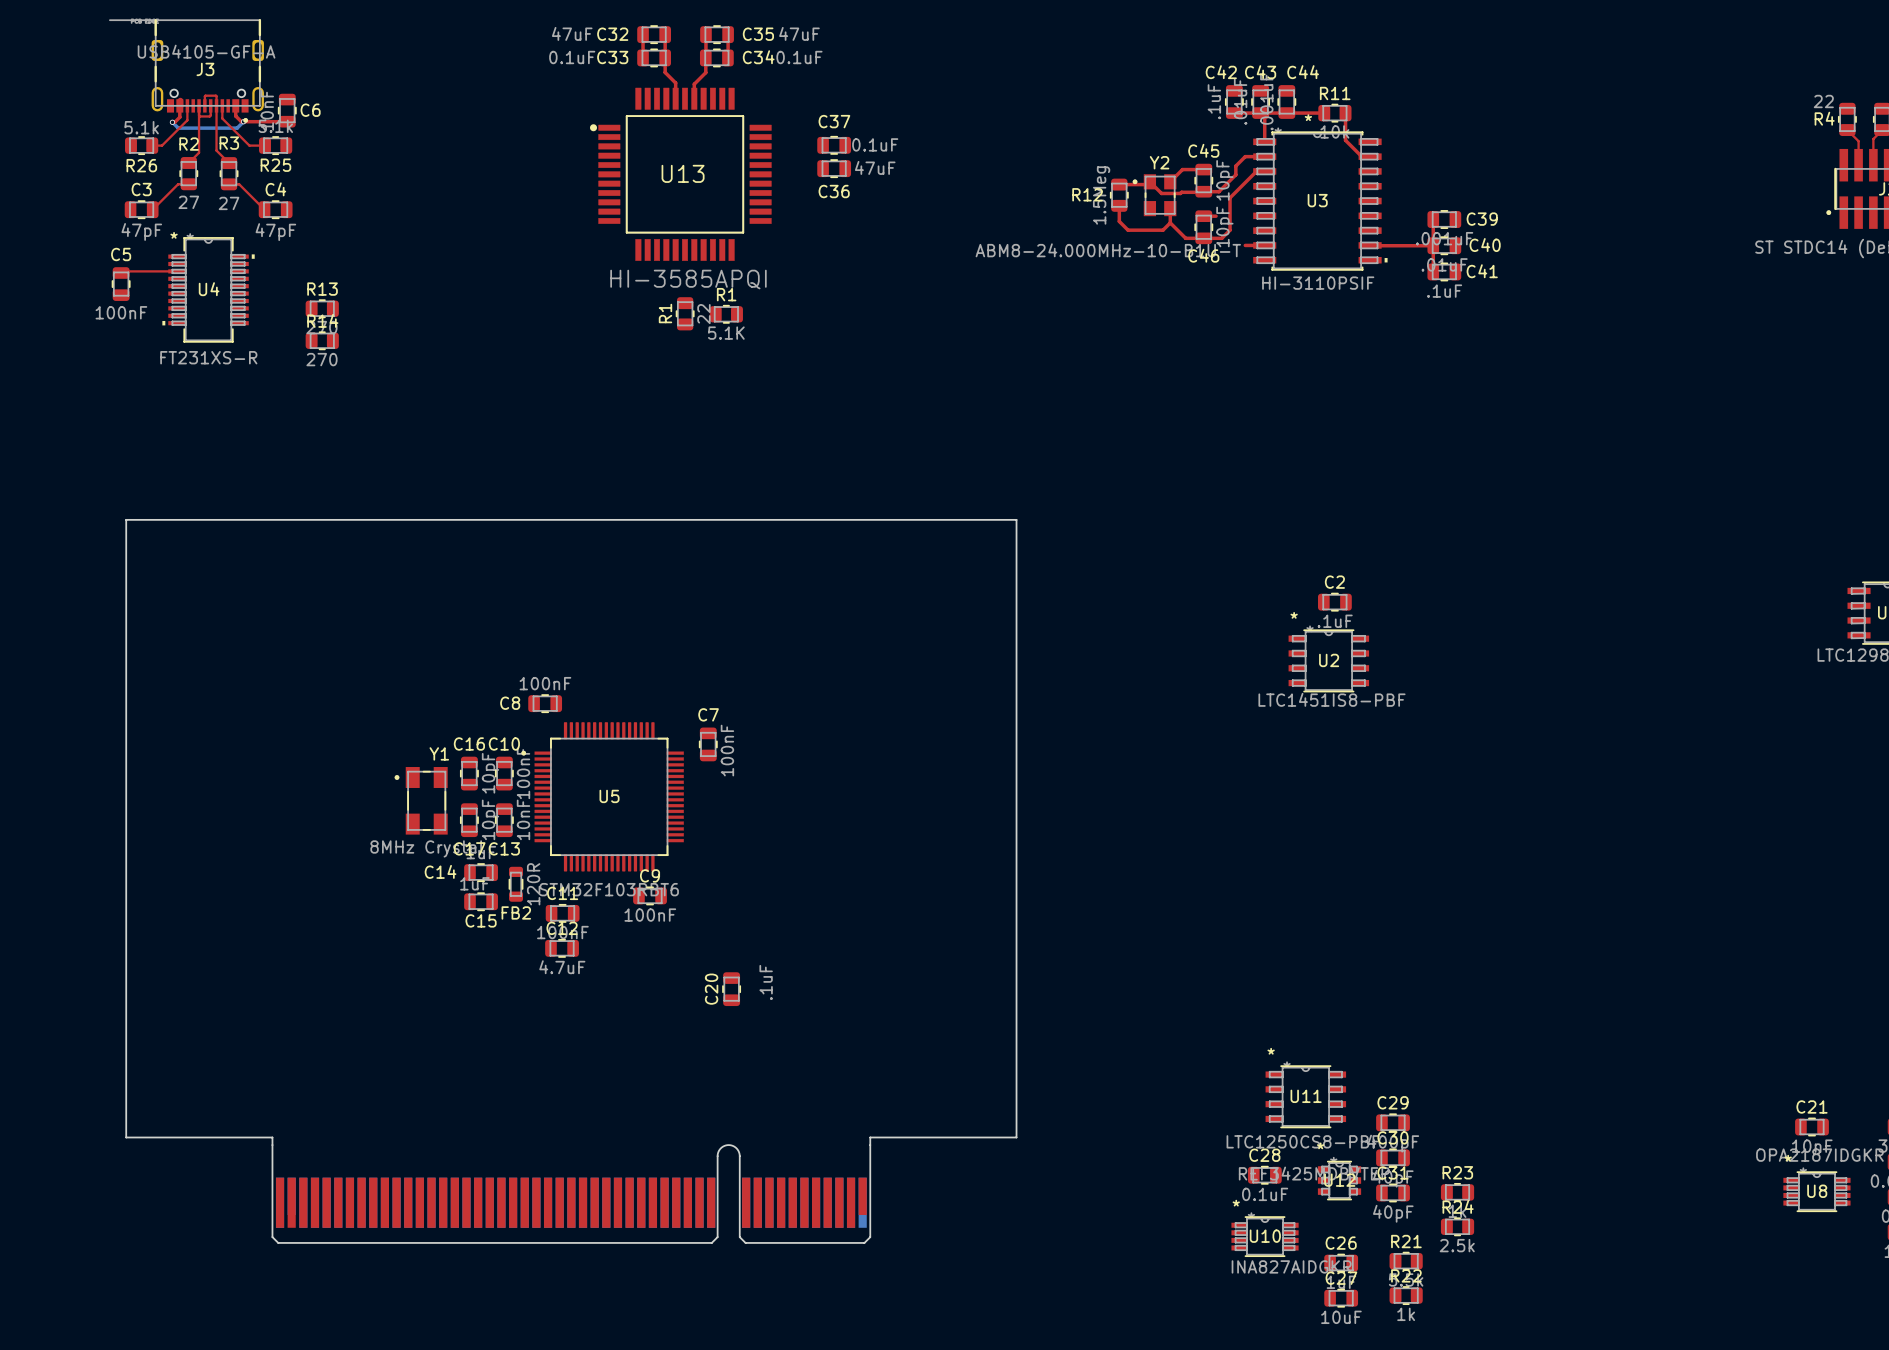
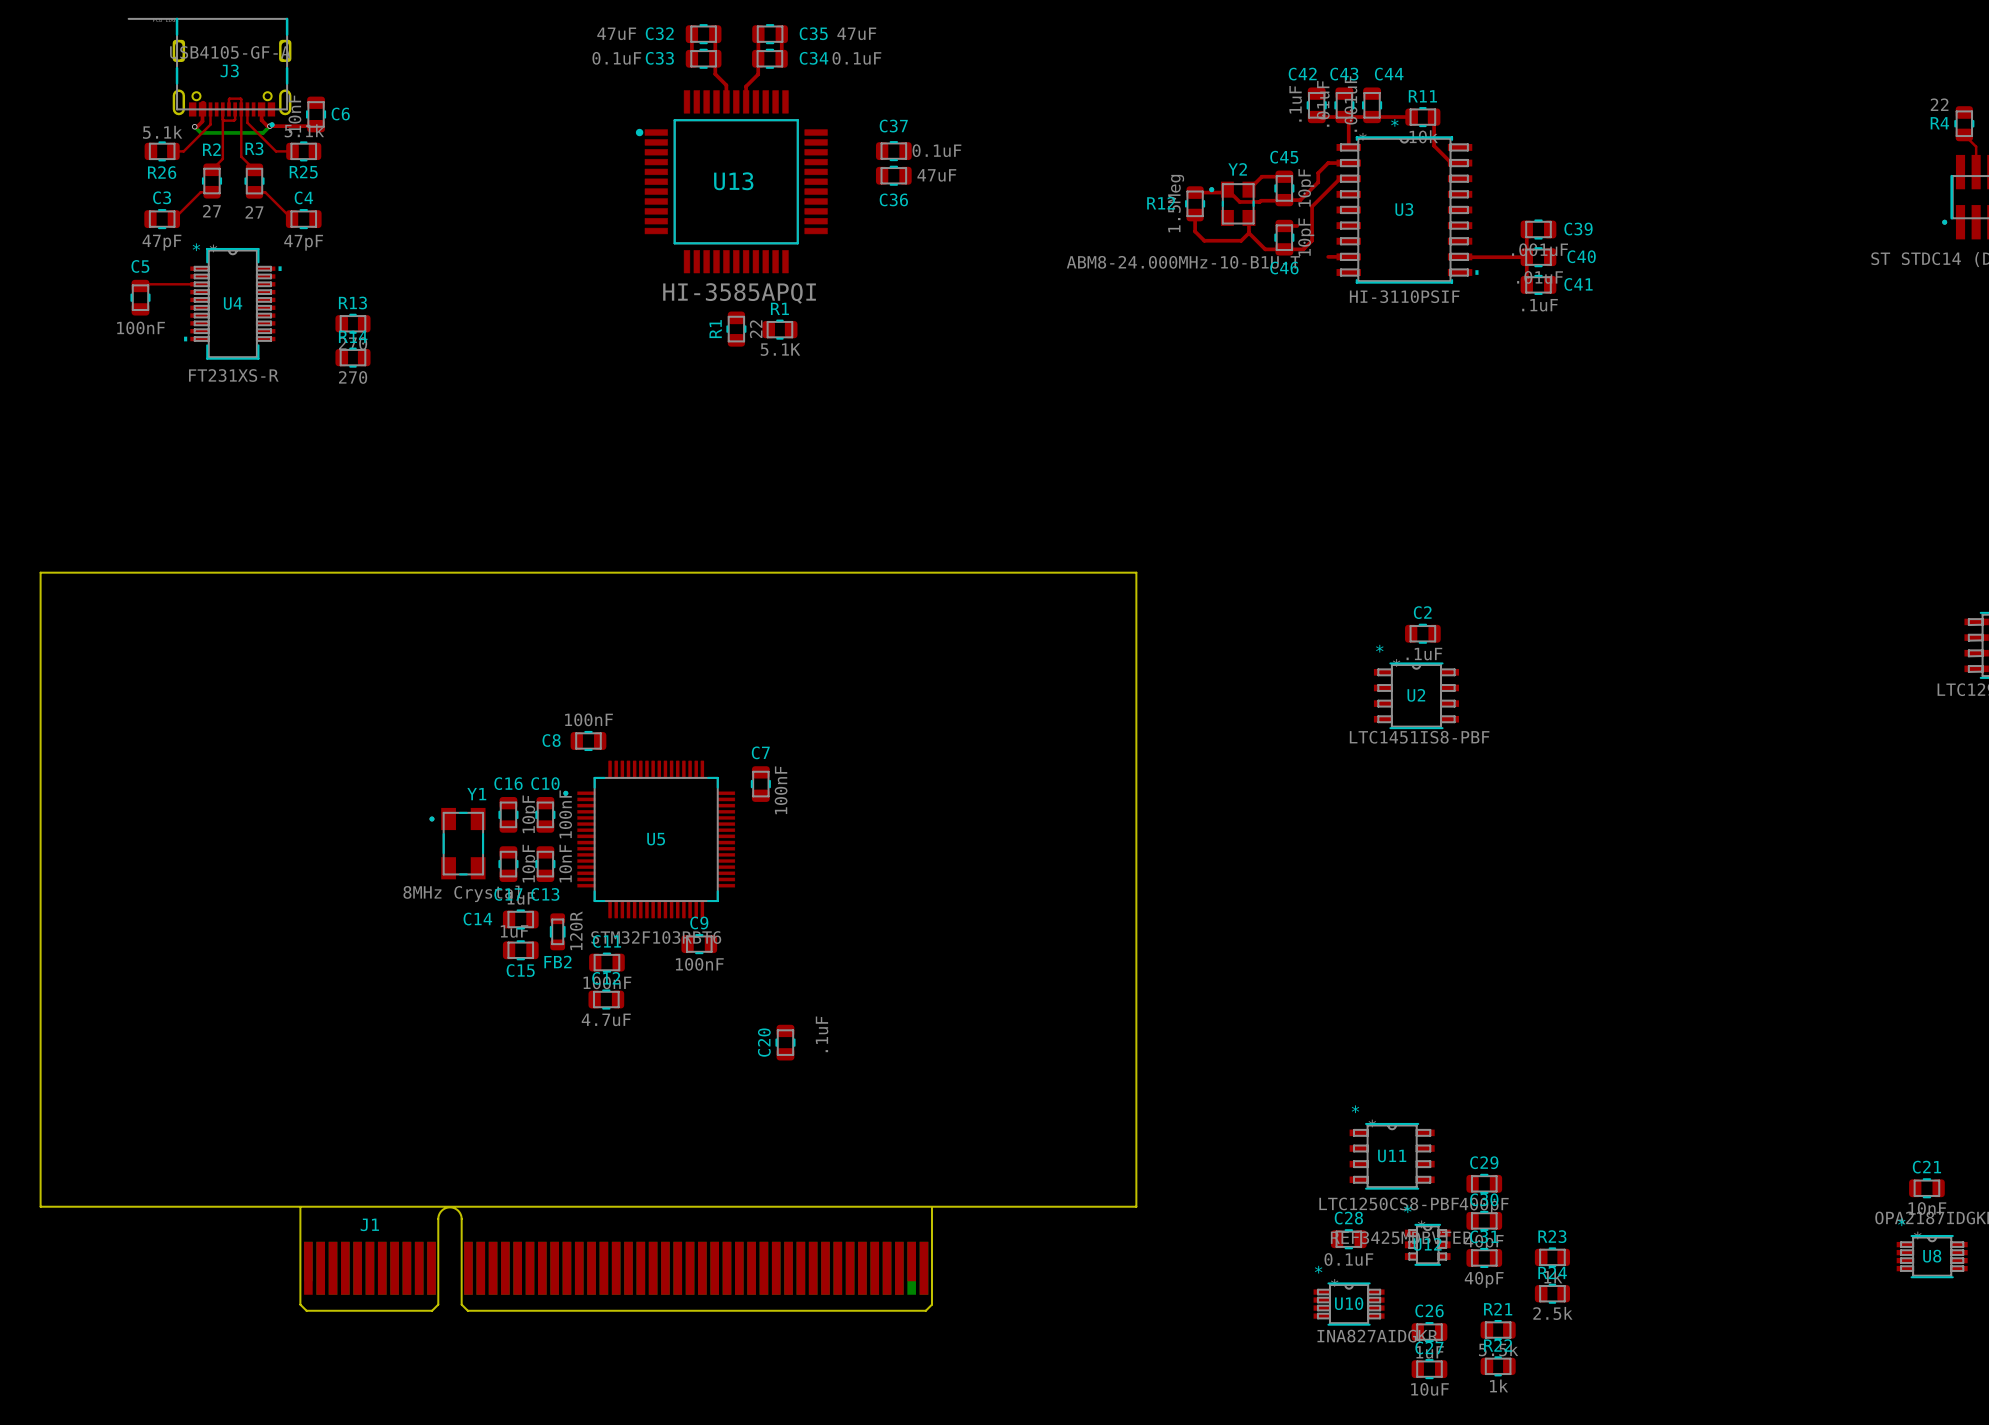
board edge: none -> (40, 572) (1136, 572) (1136, 1206) (40, 1206) (40, 572)
board edge: (272, 1145) (272, 1137) (126, 1137) (126, 519) (1016, 519) (1016, 1137) (870, 1137) (870, 1145) -> none
J1 side: bottom (571, 1194) -> top (616, 1259)

